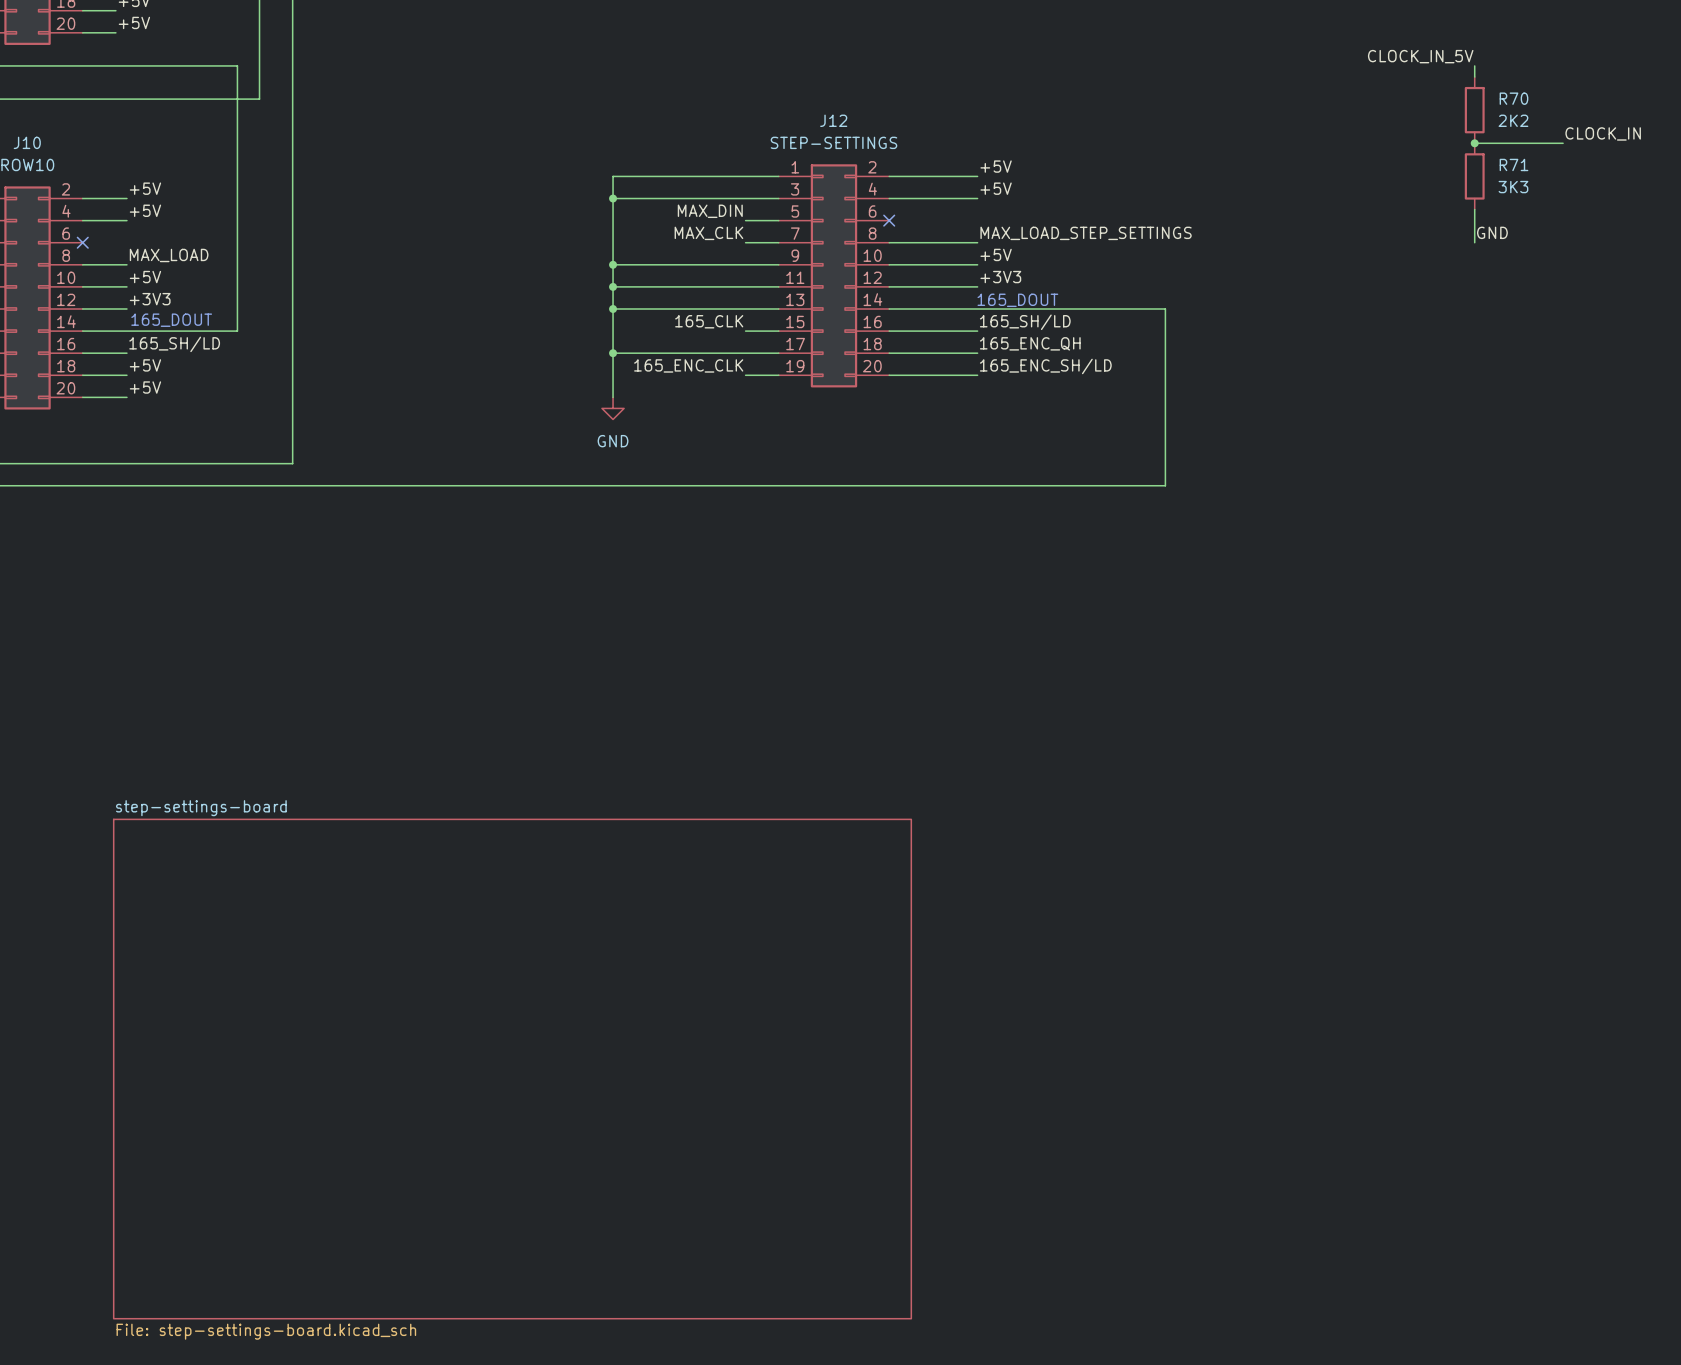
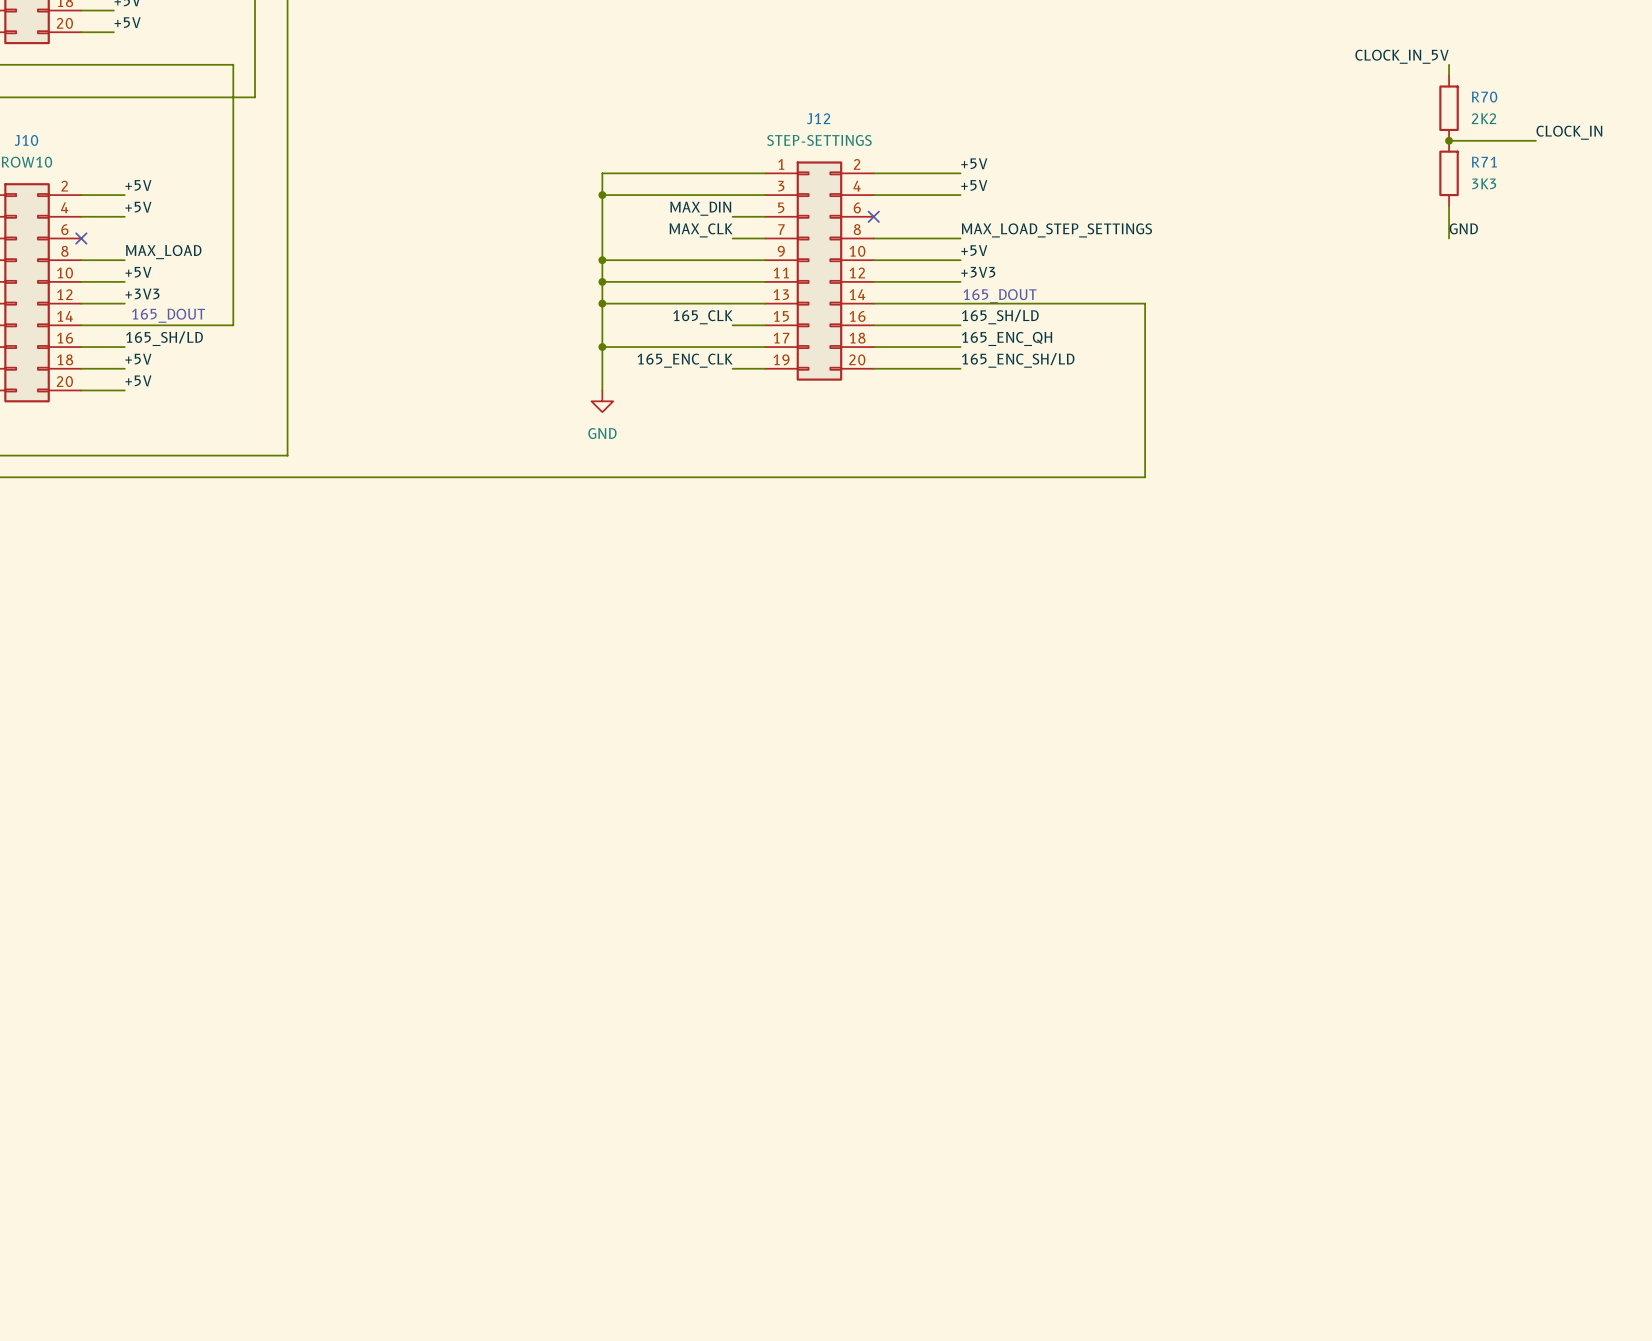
sheet step-settings-board: File: step-settings-board.kicad_sch (512, 1069) -> none

